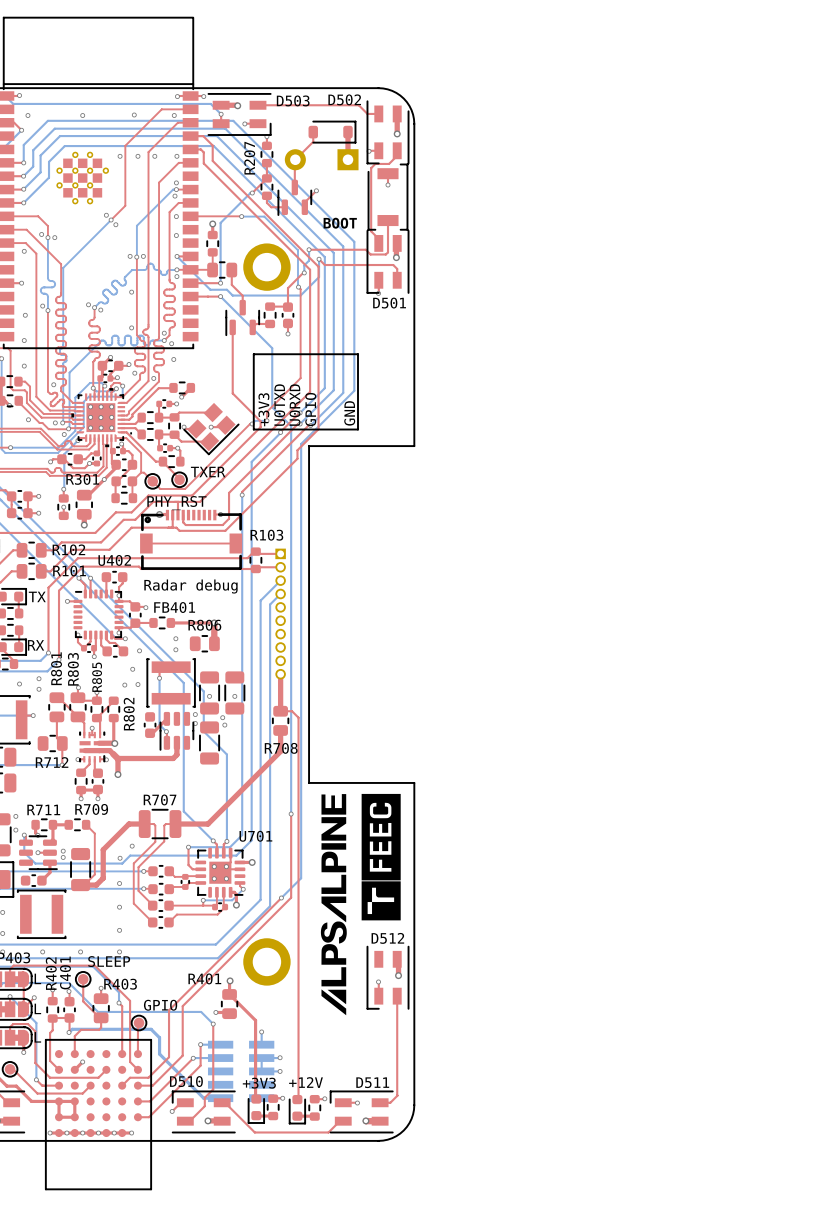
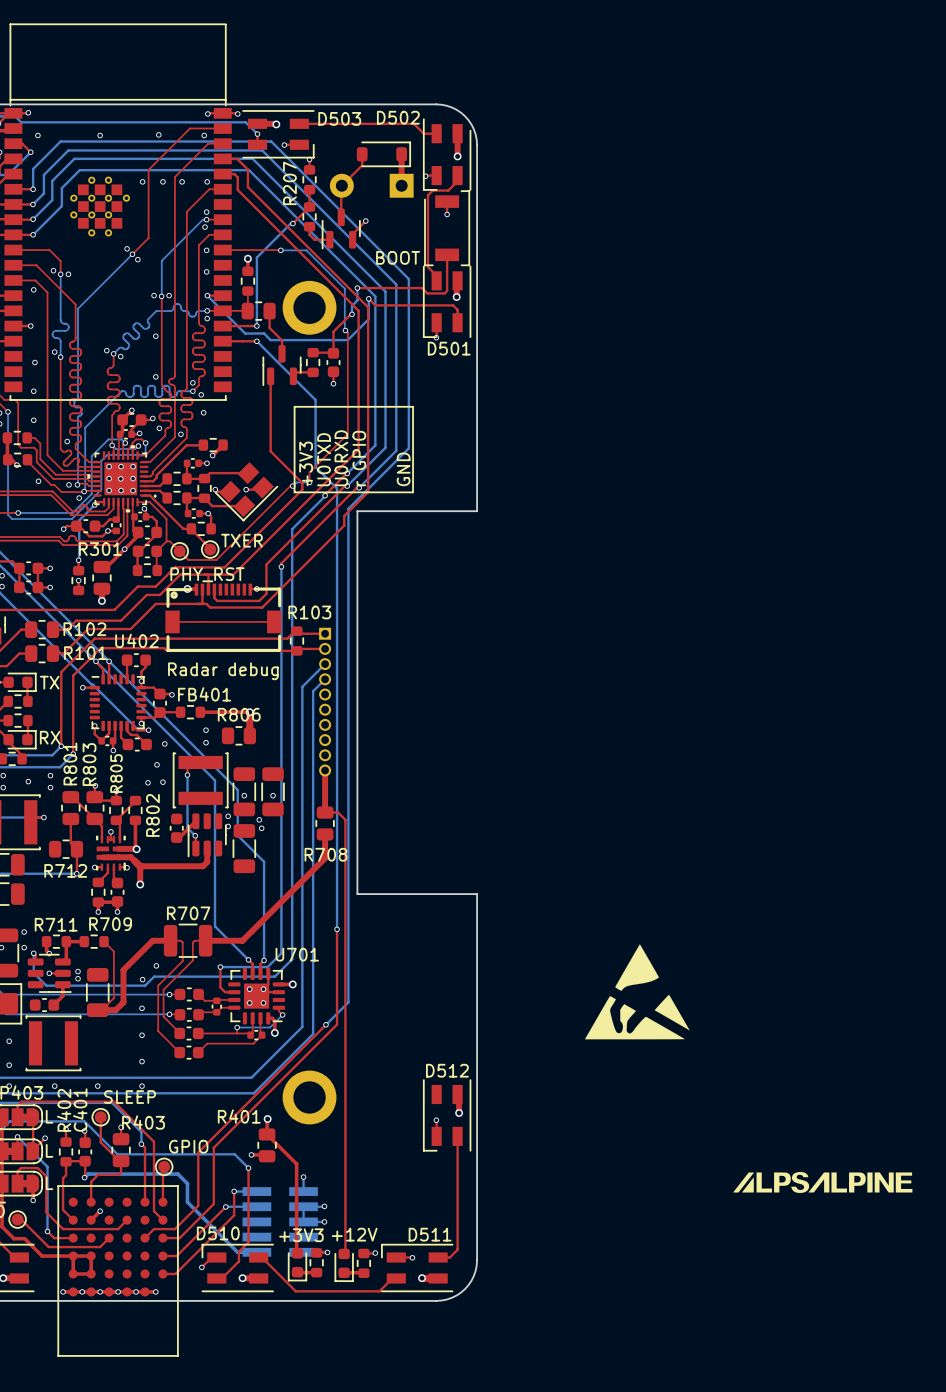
text: GPIO (310, 409) -> r GPIO (359, 458)
drawing: [361, 793, 401, 921] -> none
drawing: [320, 794, 347, 1016] -> none
drawing: none -> [584, 944, 690, 1040]
drawing: none -> [733, 1172, 913, 1193]

